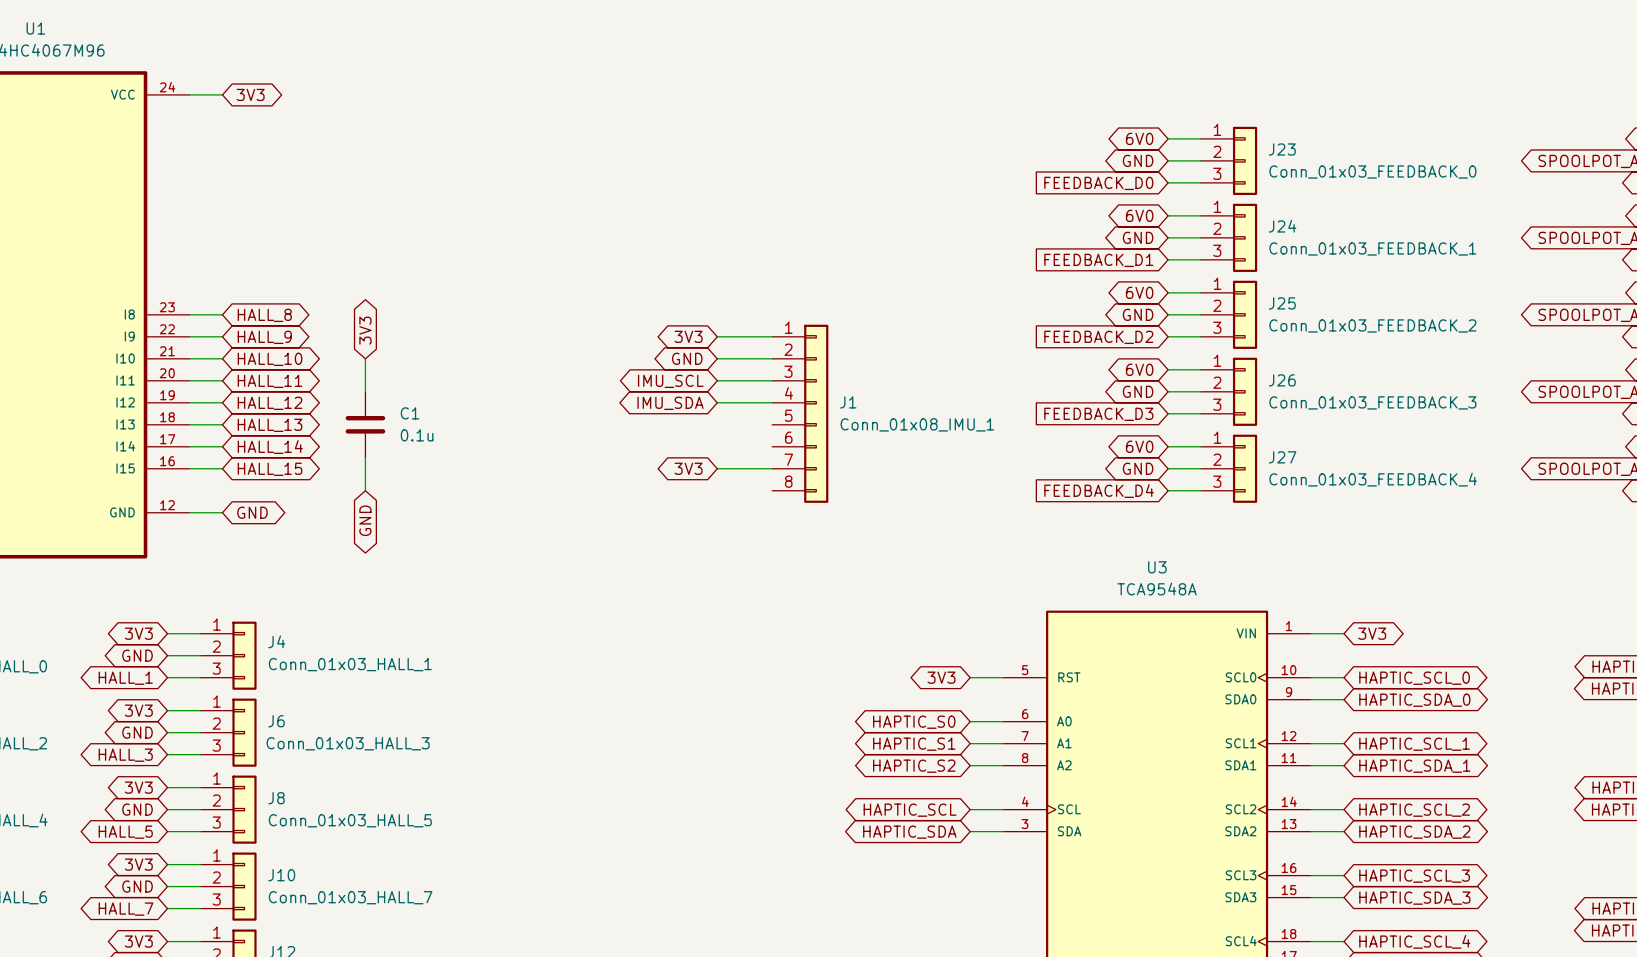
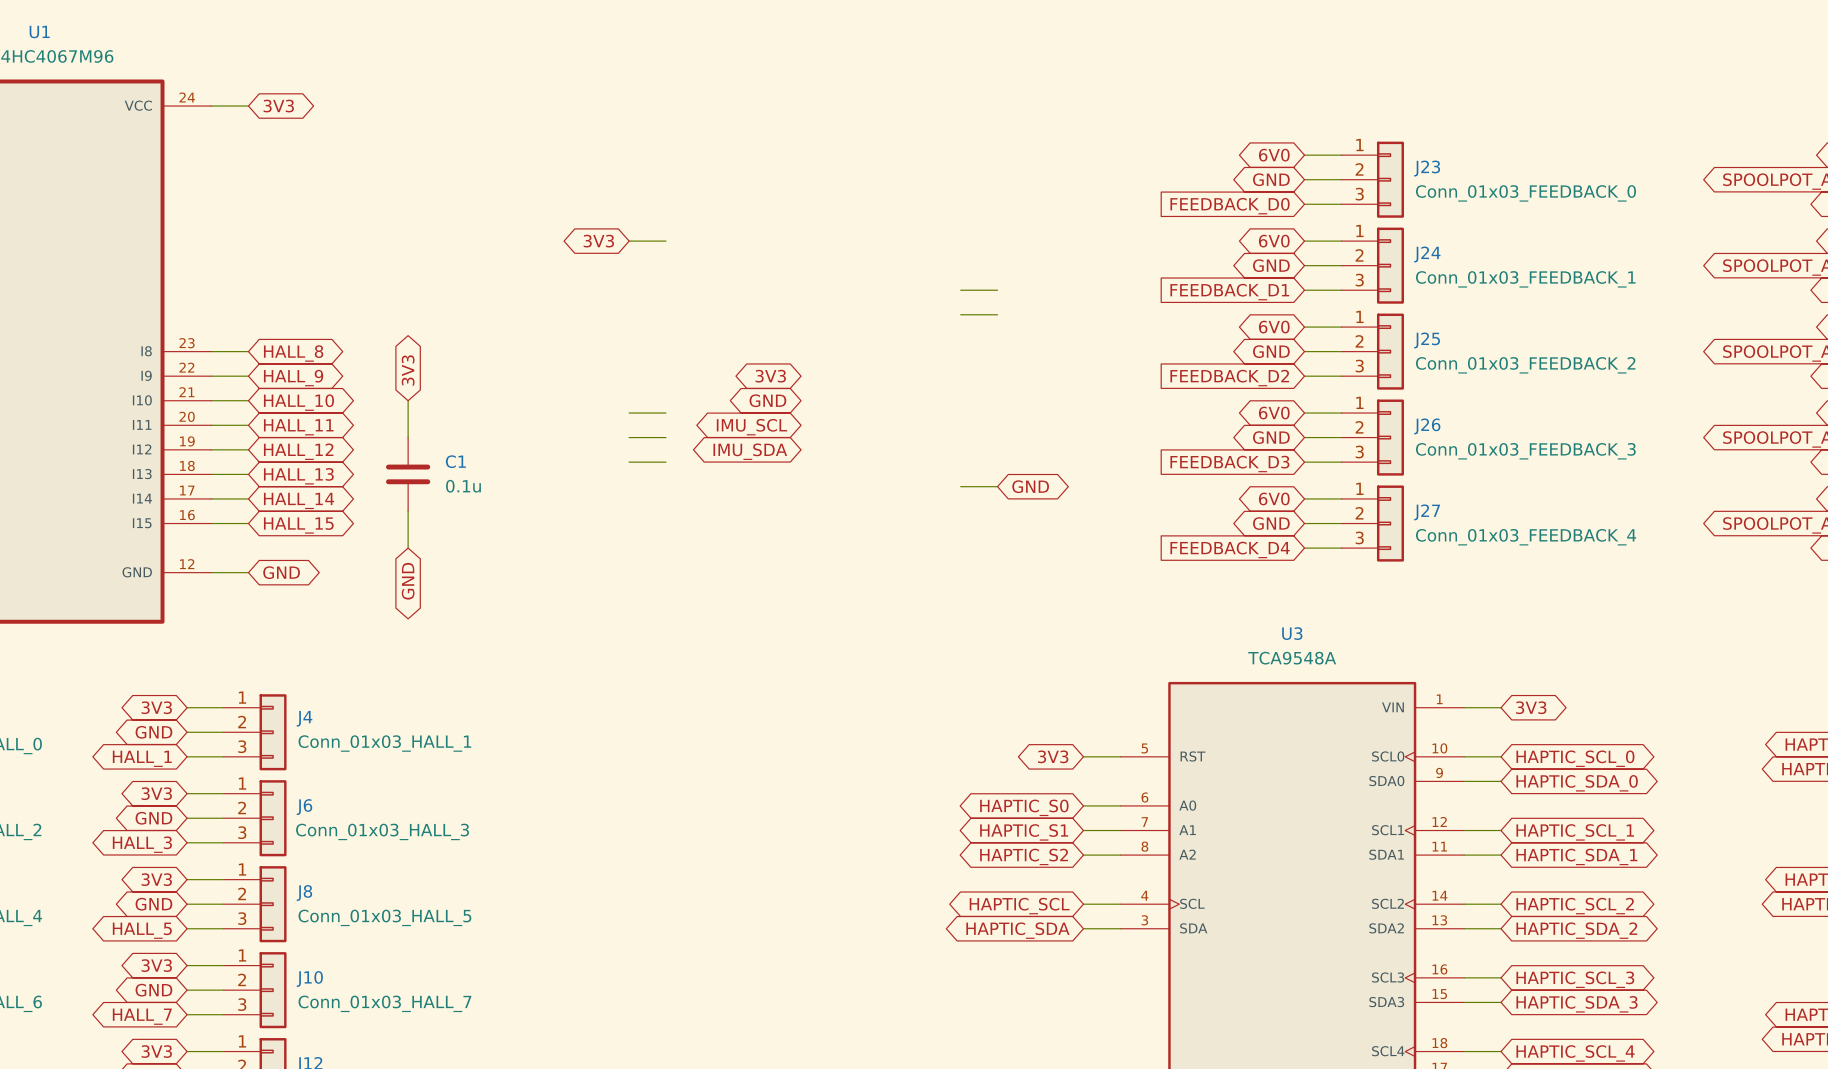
global label: none -> 3V3 (598, 241)
wire: none -> (629, 241) (665, 241)
wire: none -> (960, 290) (997, 290)
wire: none -> (960, 314) (997, 314)
wire: (717, 336) (772, 336) -> none
wire: (717, 358) (772, 358) -> none
wire: none -> (629, 413) (665, 413)
wire: (717, 380) (772, 380) -> none
wire: none -> (629, 437) (665, 437)
wire: (717, 402) (772, 402) -> none
wire: none -> (629, 462) (665, 462)
J1: Conn_01x08_IMU_1 (800, 413) -> none
wire: none -> (960, 486) (997, 486)
global label: none -> GND (1030, 486)
global label: 3V3 (688, 468) -> none
wire: (717, 468) (772, 468) -> none

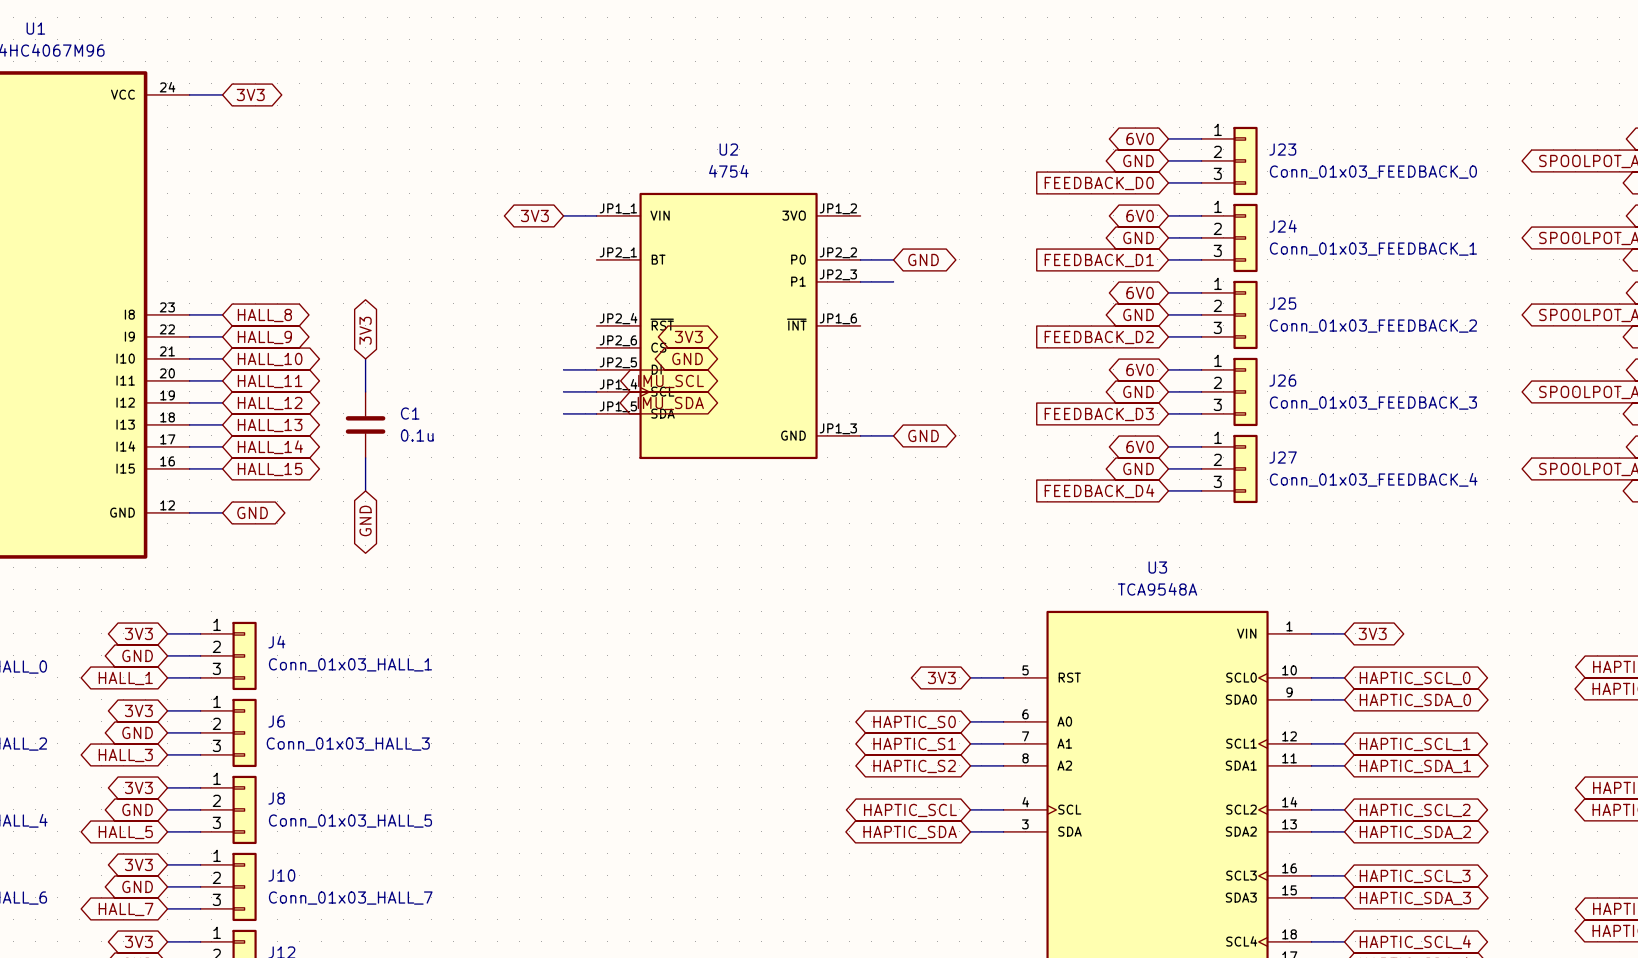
global label: none -> GND (923, 259)
U2: none -> 4754 (728, 325)

